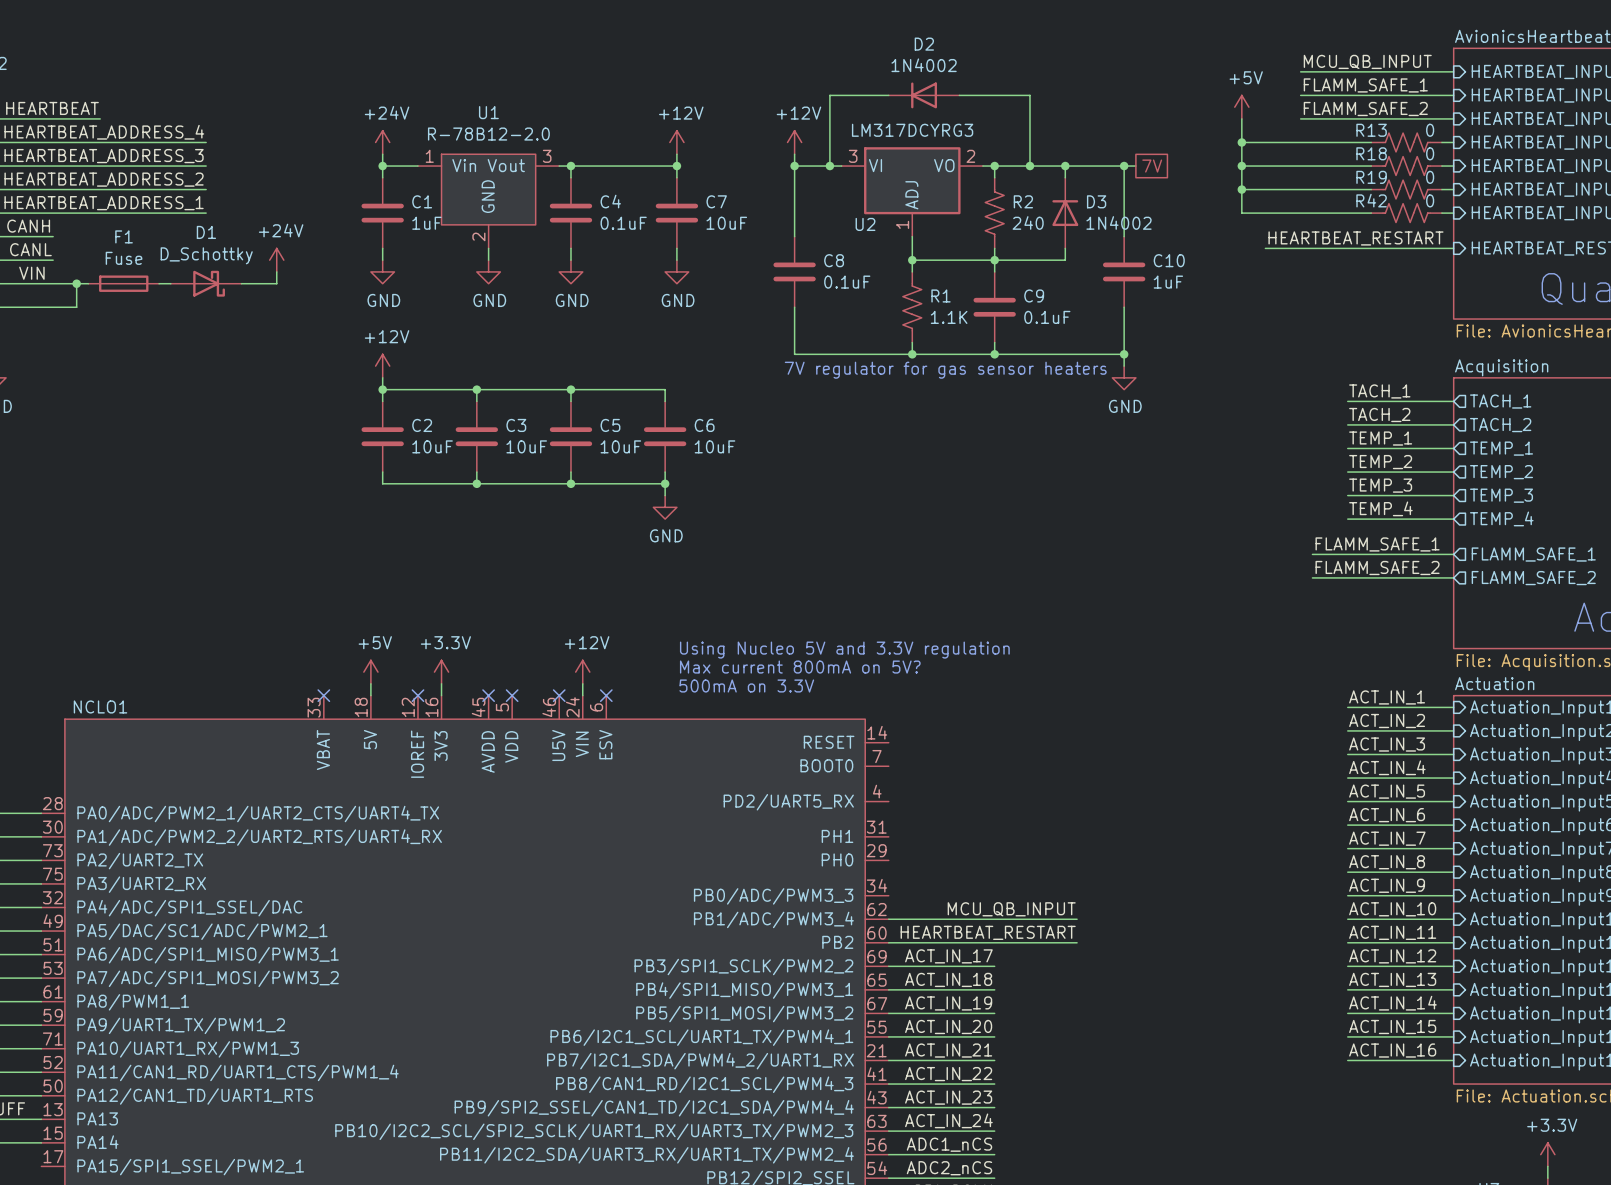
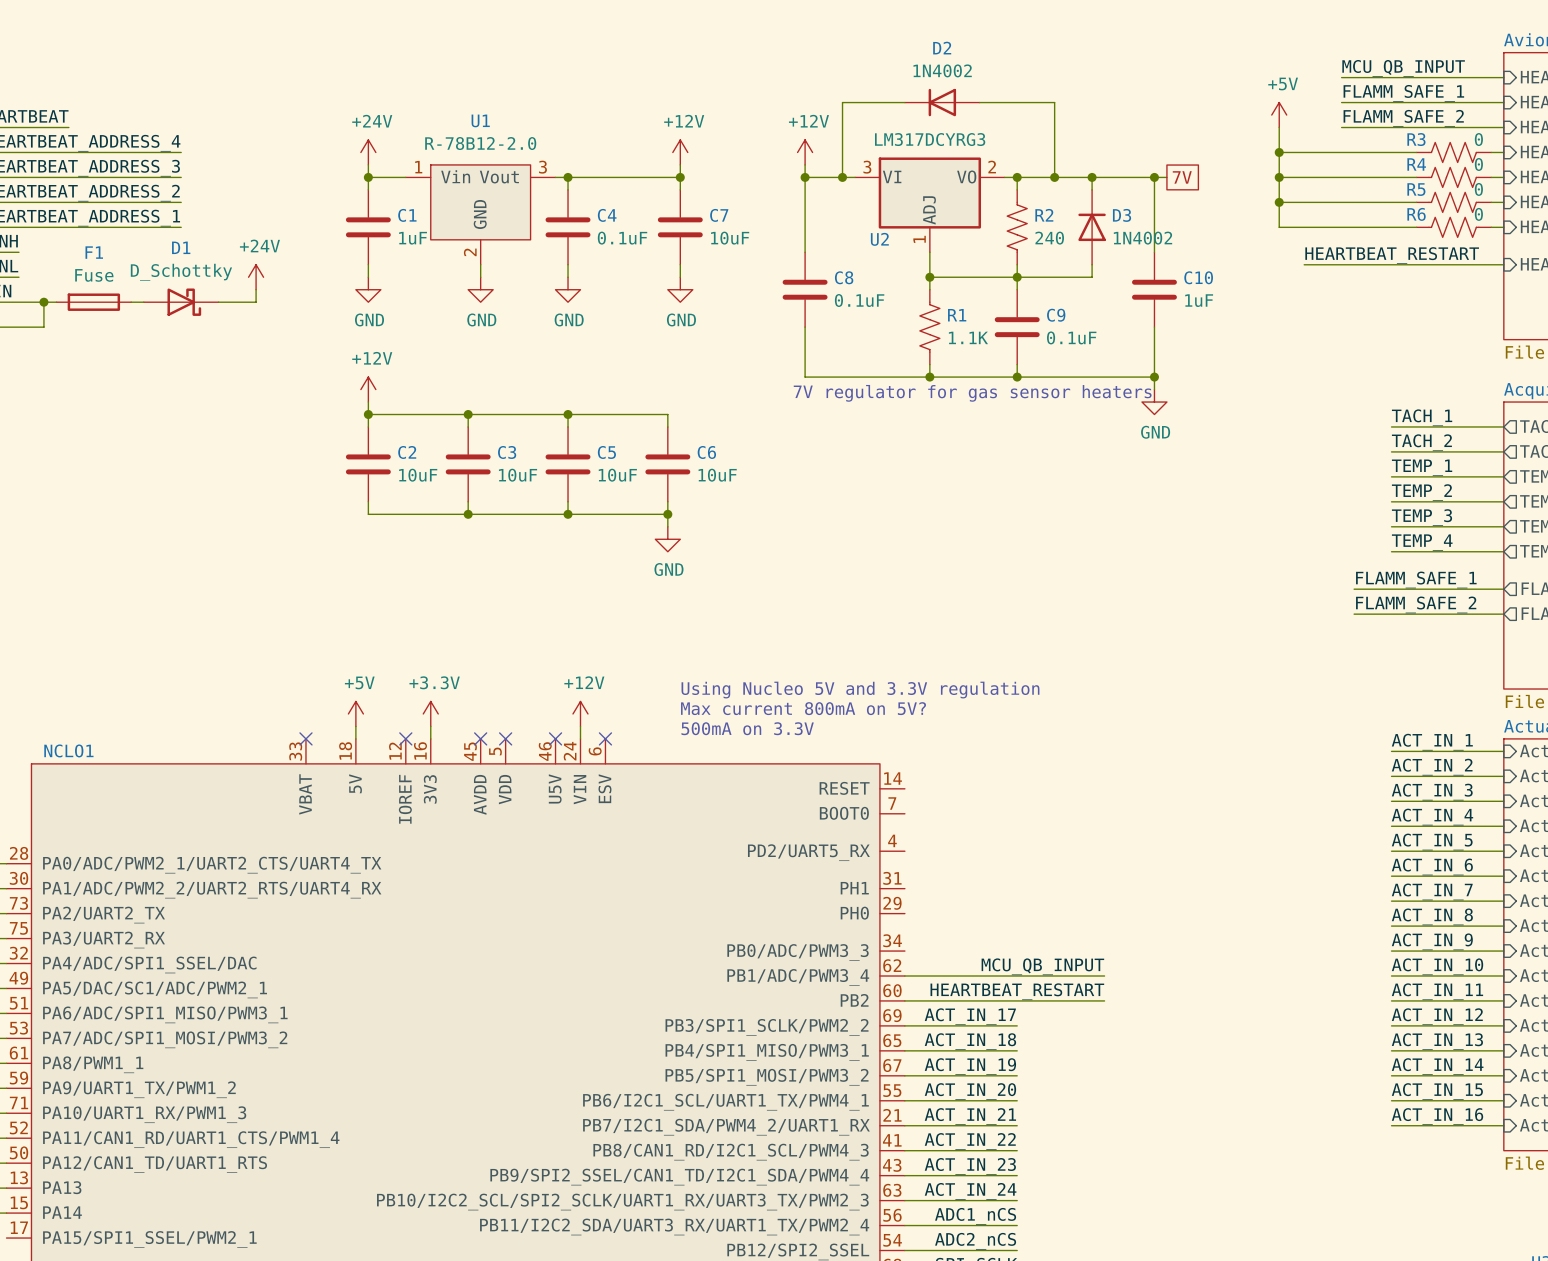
R13 name: R13 (1371, 130) -> R3 (1416, 139)
R18 name: R18 (1371, 153) -> R4 (1416, 164)
R19 name: R19 (1371, 177) -> R5 (1416, 189)
R42 name: R42 (1371, 200) -> R6 (1416, 214)

